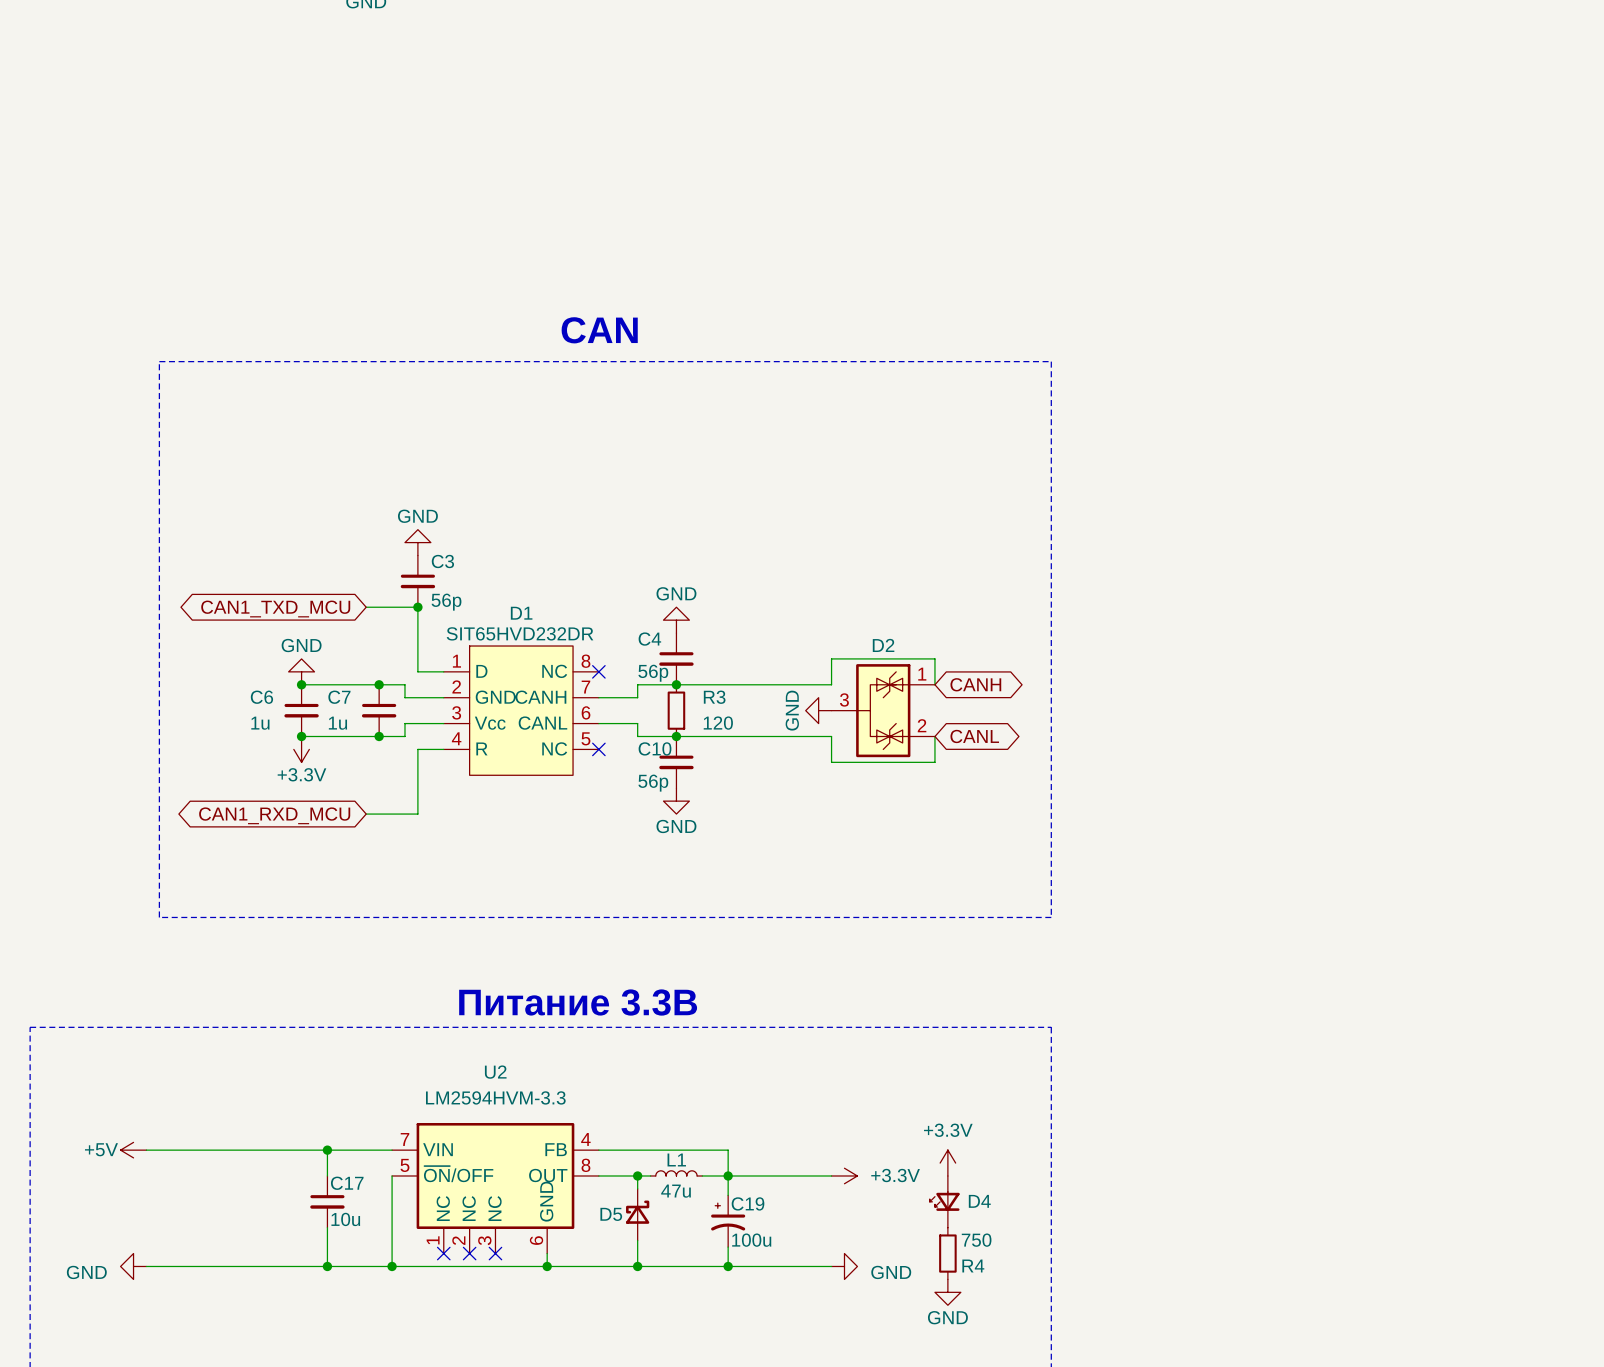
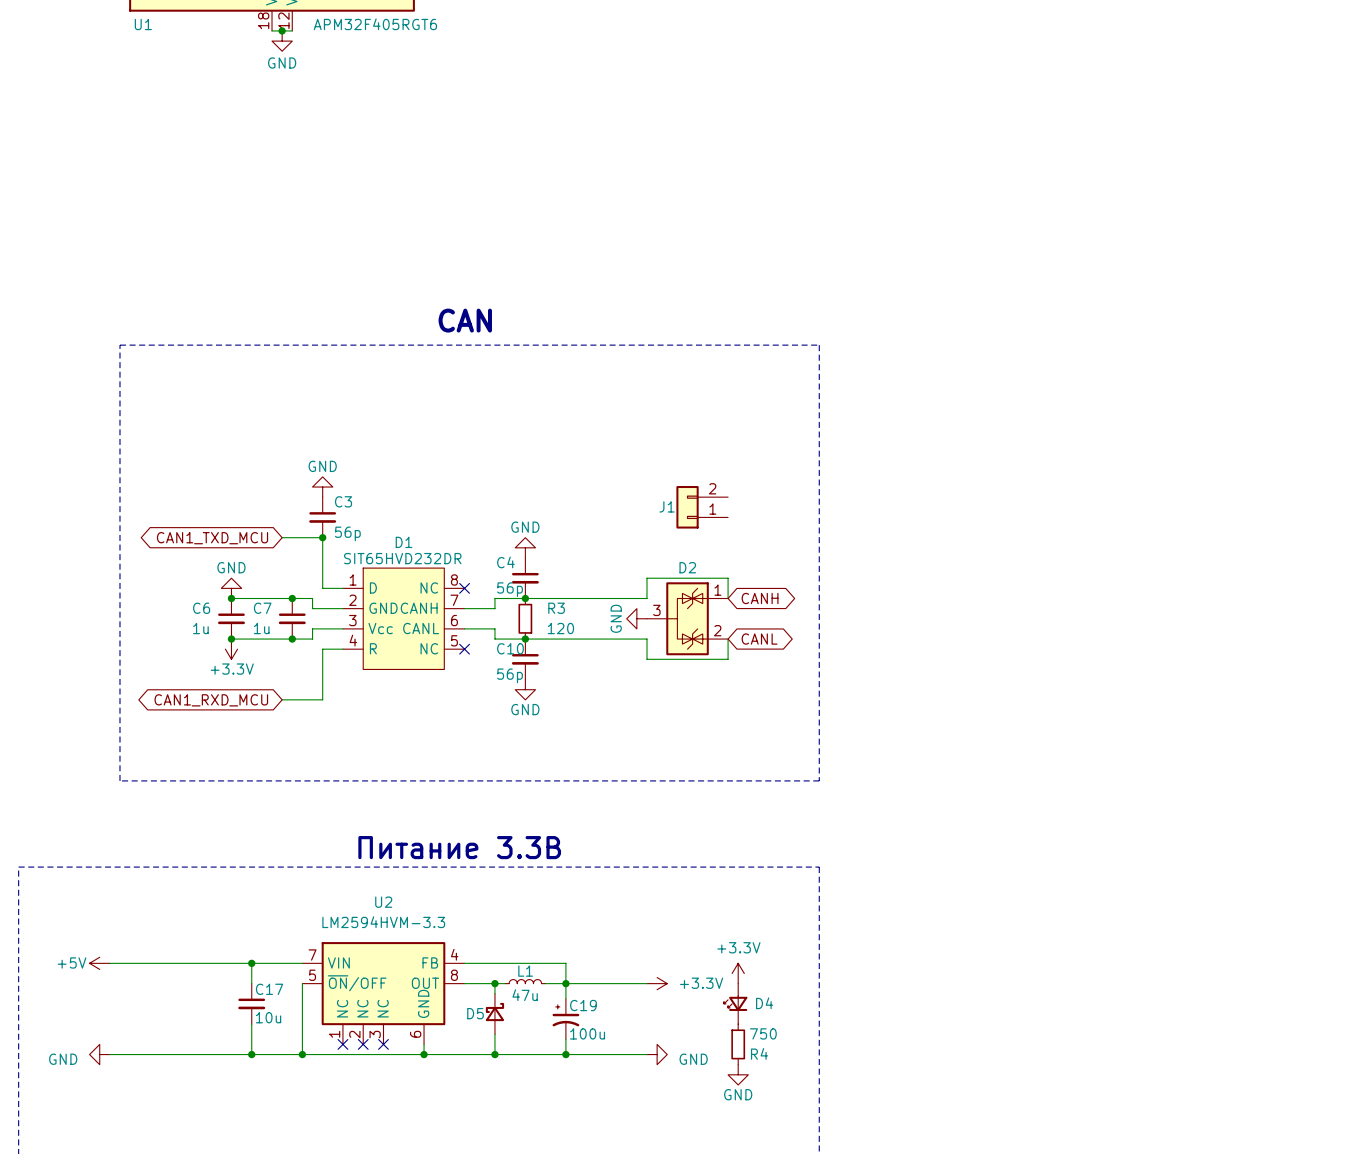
J1: none -> (702, 507)

